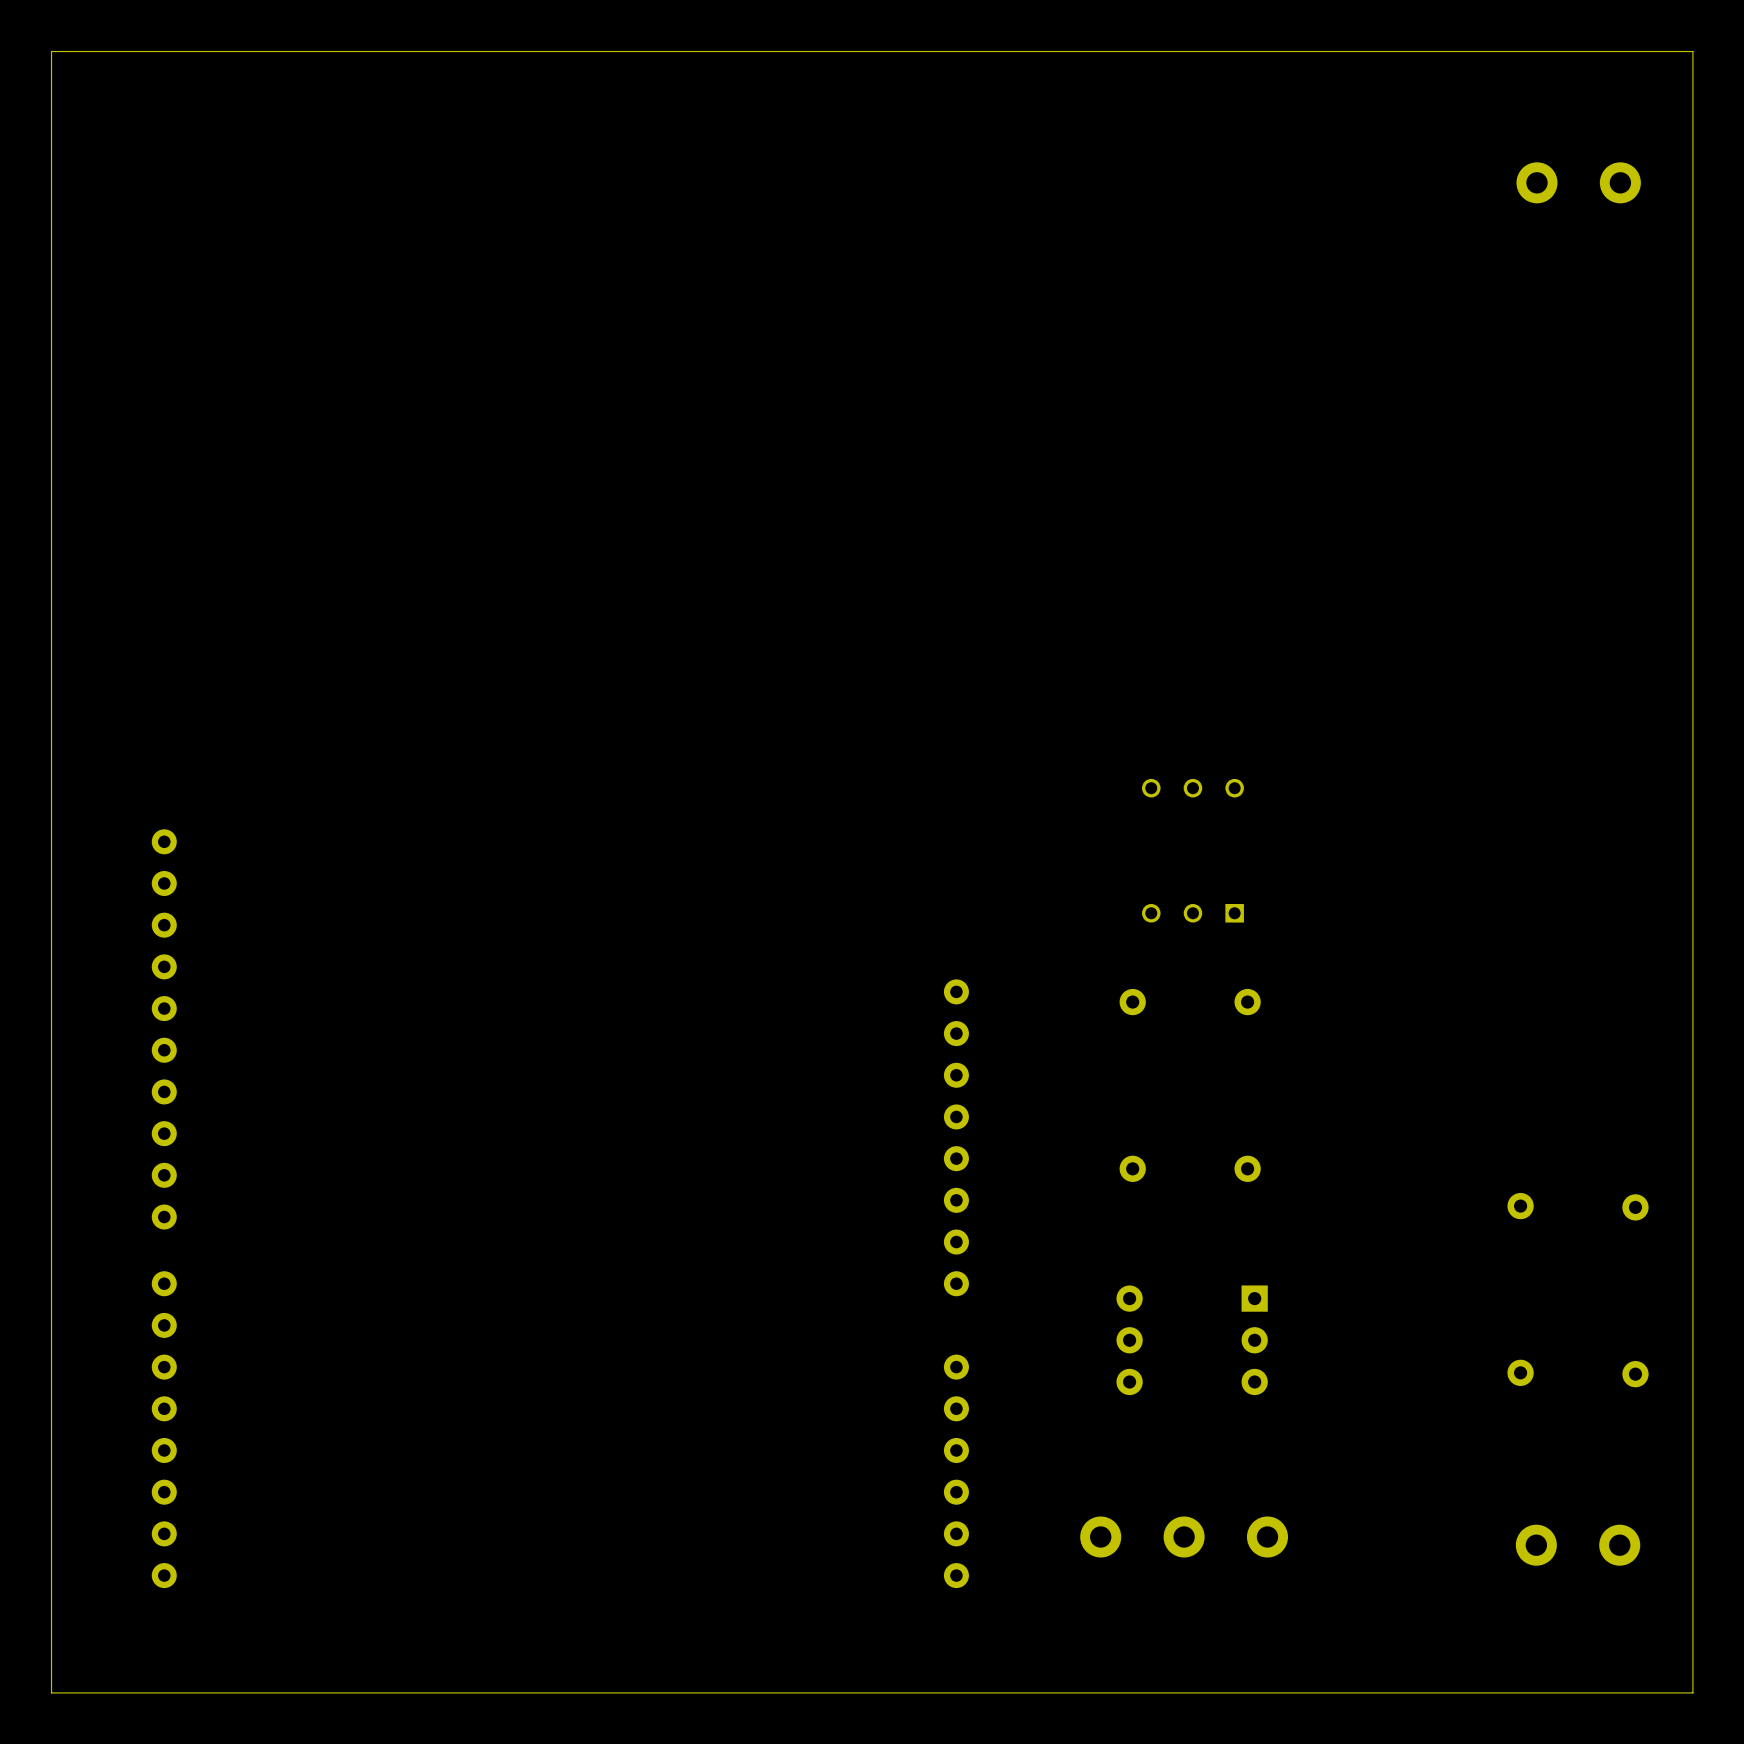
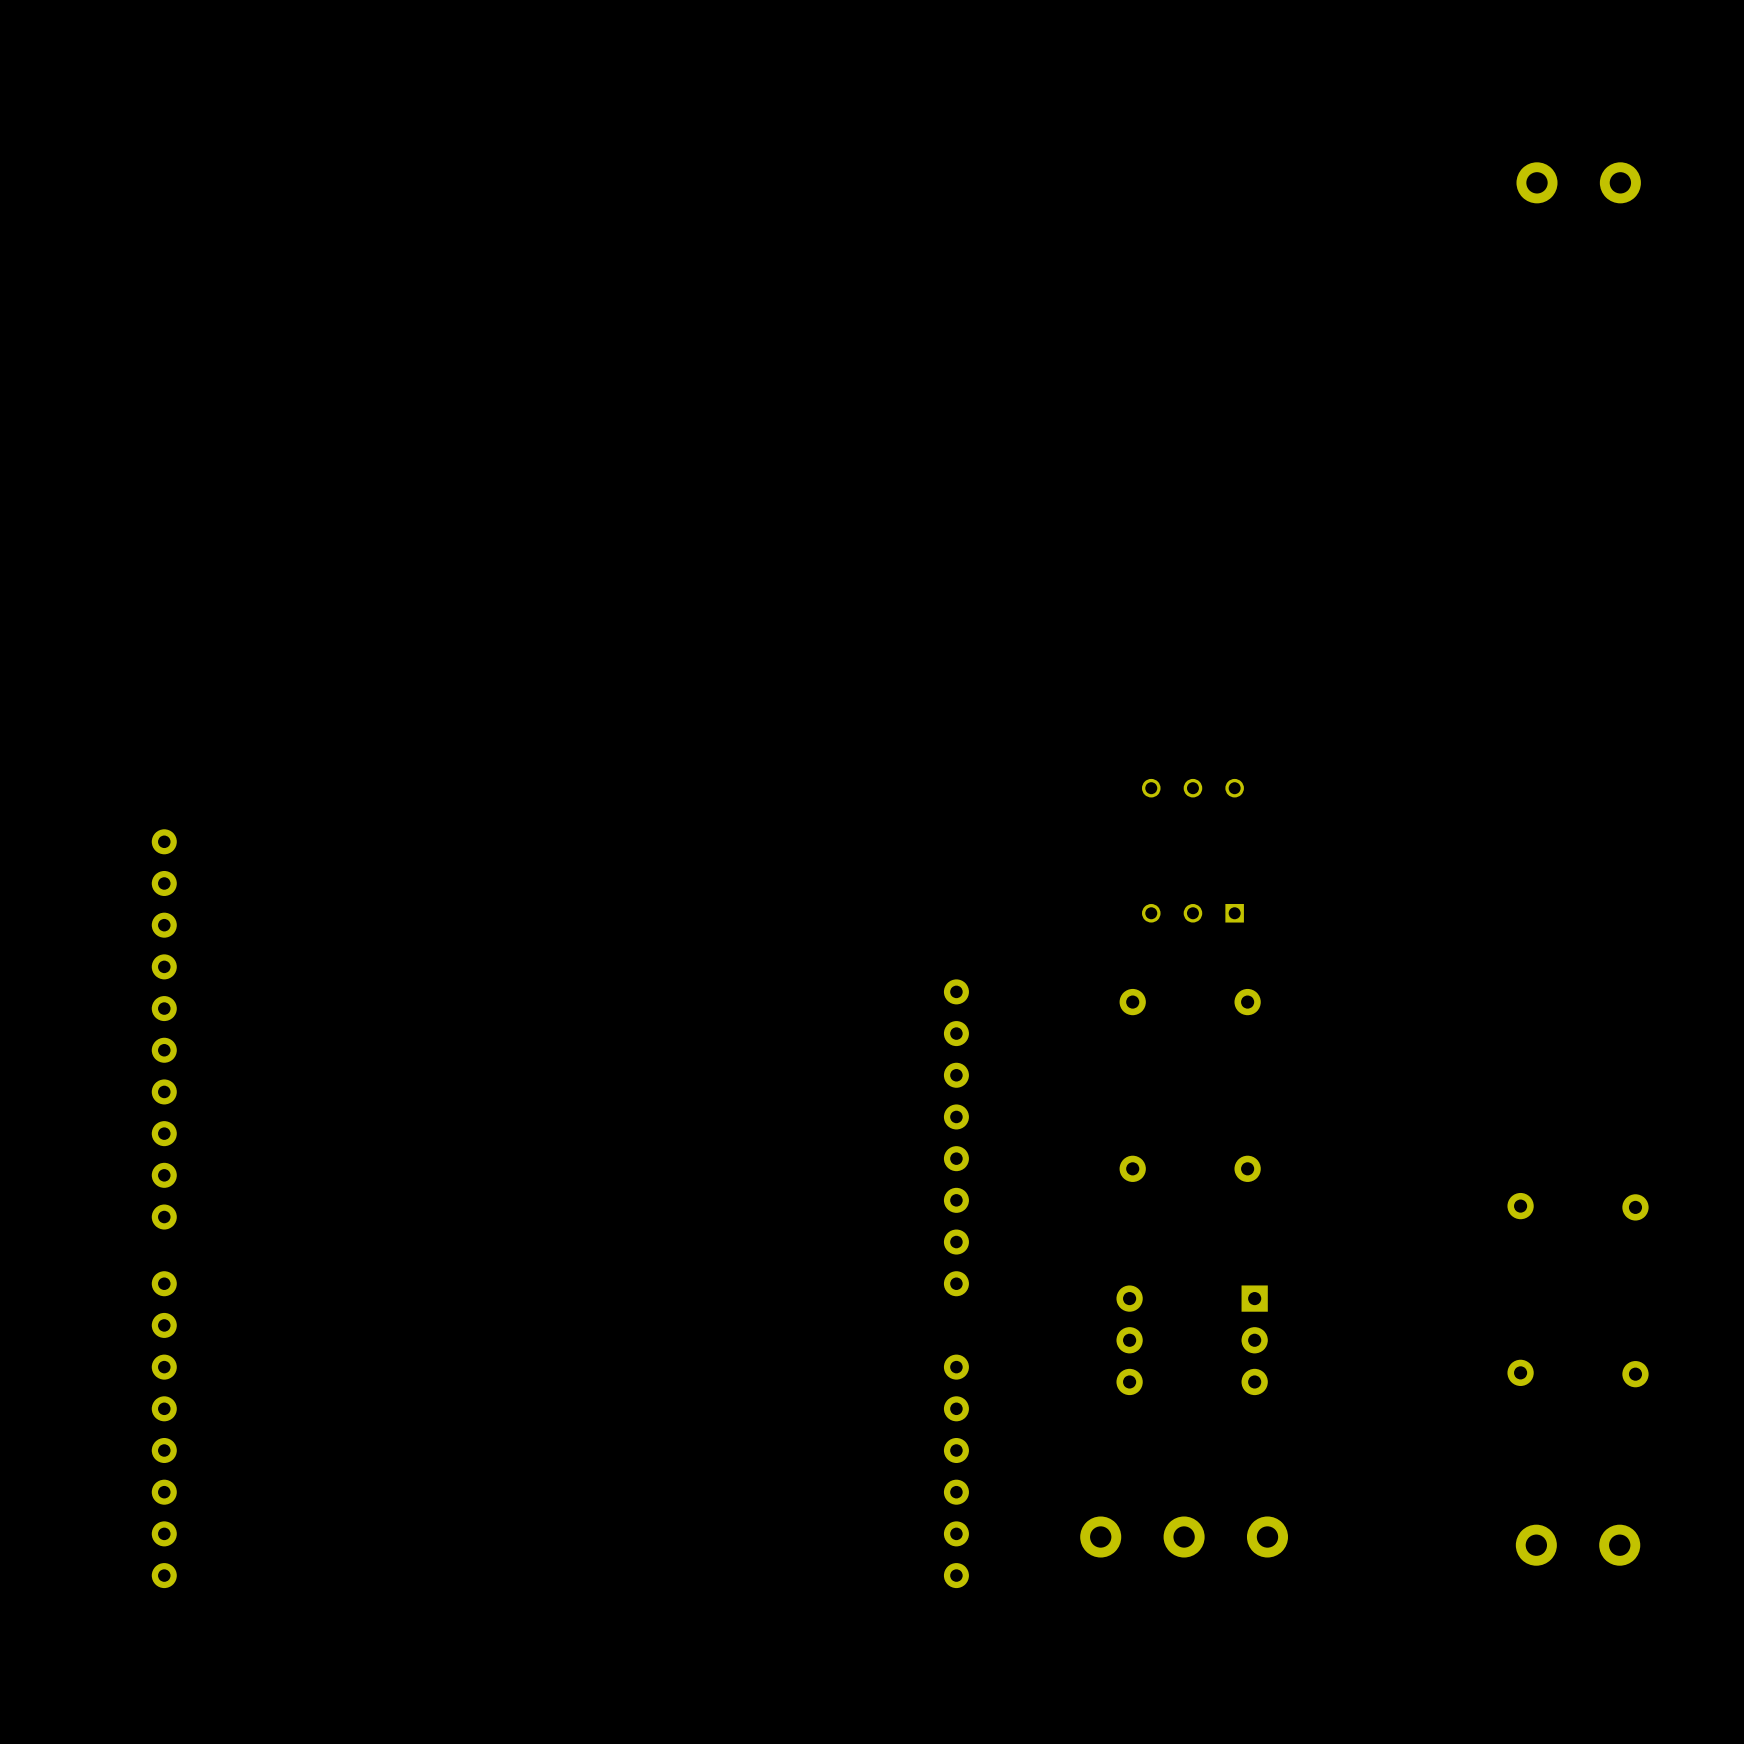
board edge: (1692, 51) (51, 51) (51, 1692) (1692, 1692) (1692, 51) -> none

